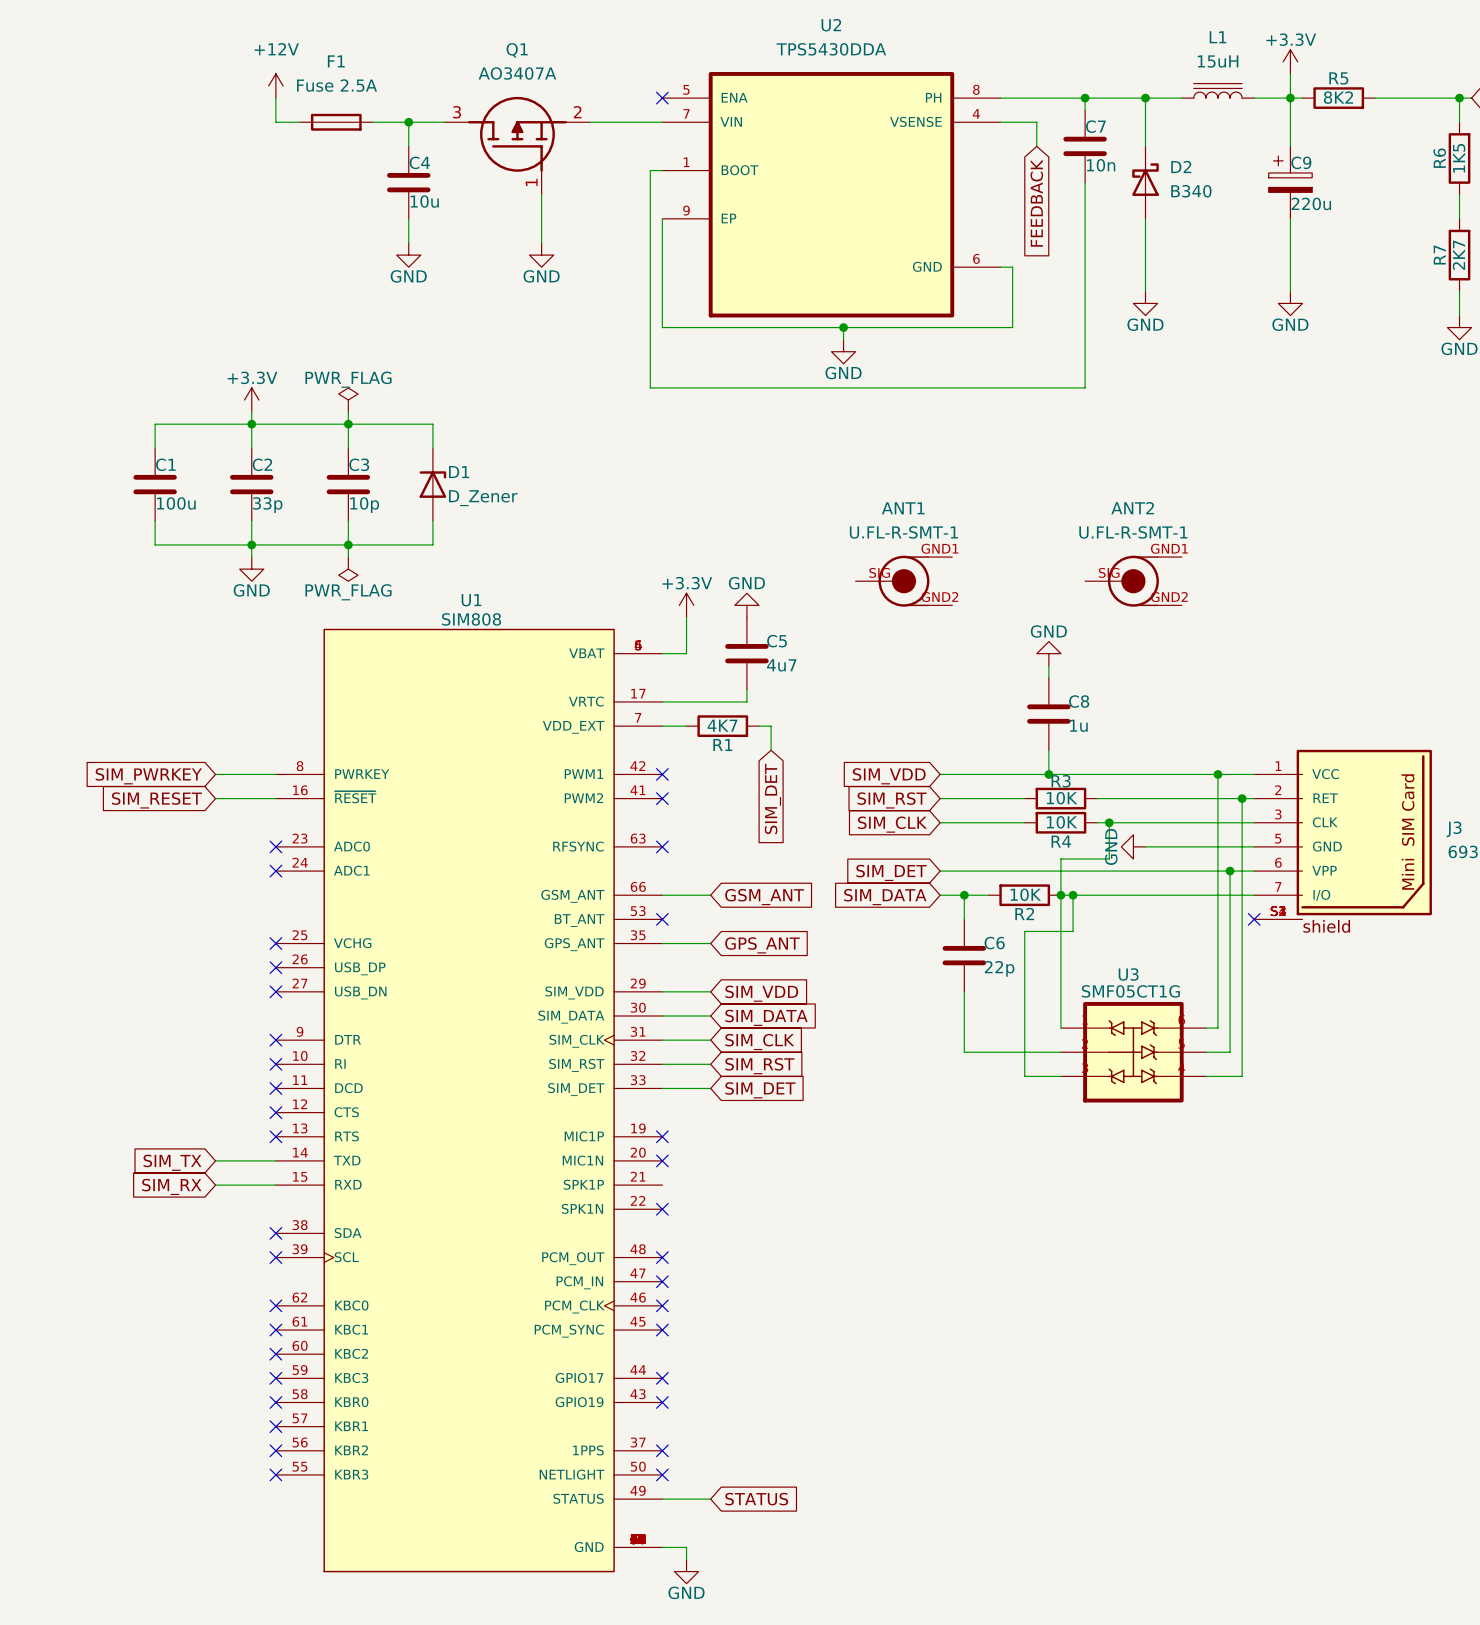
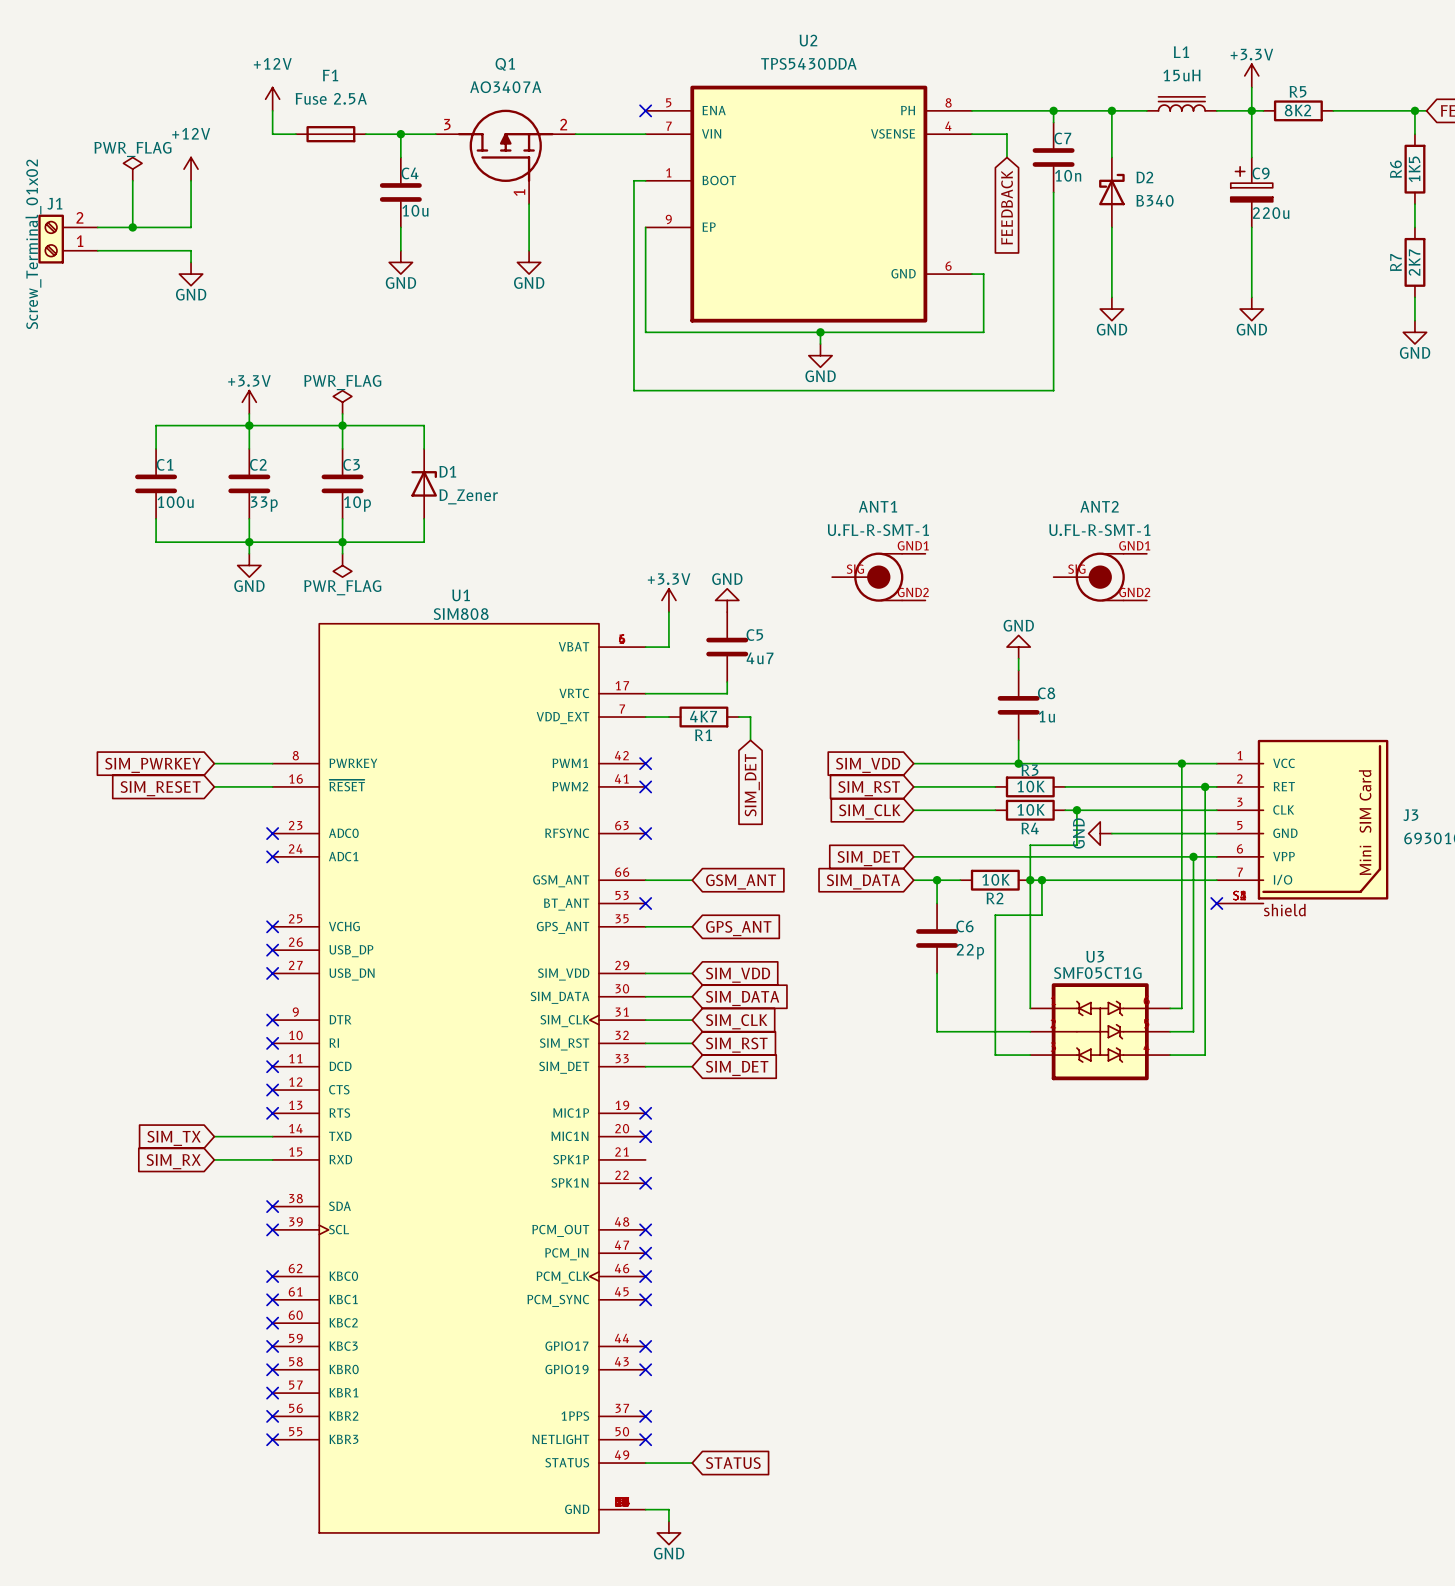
power symbol: none -> PWR_FLAG (132, 169)
power symbol: none -> +12V (191, 169)
wire: none -> (132, 180) (132, 227)
wire: none -> (191, 180) (191, 227) (97, 227)
junction: none -> (132, 227)
J1: none -> Screw_Terminal_01x02 (68, 239)
wire: none -> (97, 250) (191, 250) (191, 262)
power symbol: none -> GND (191, 274)

